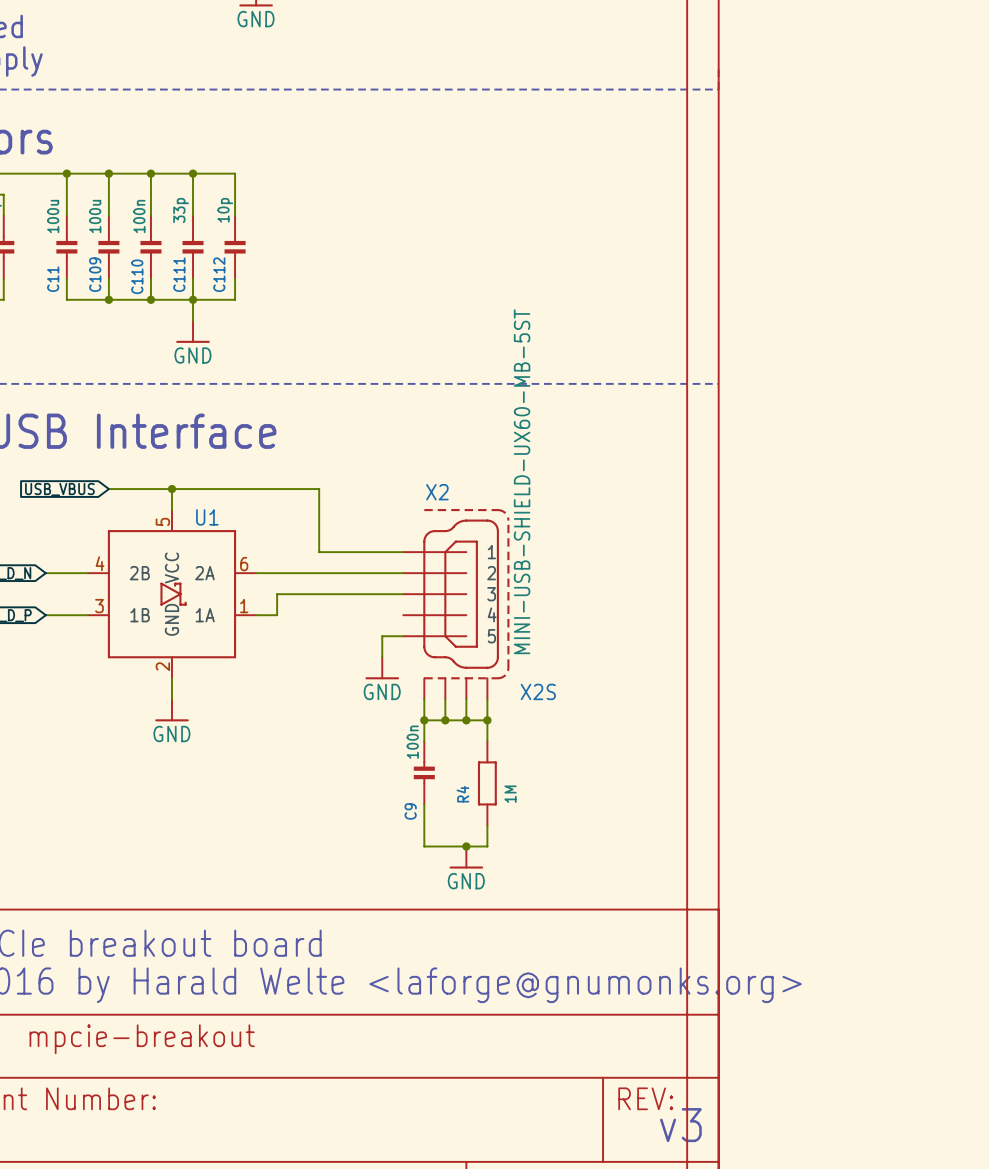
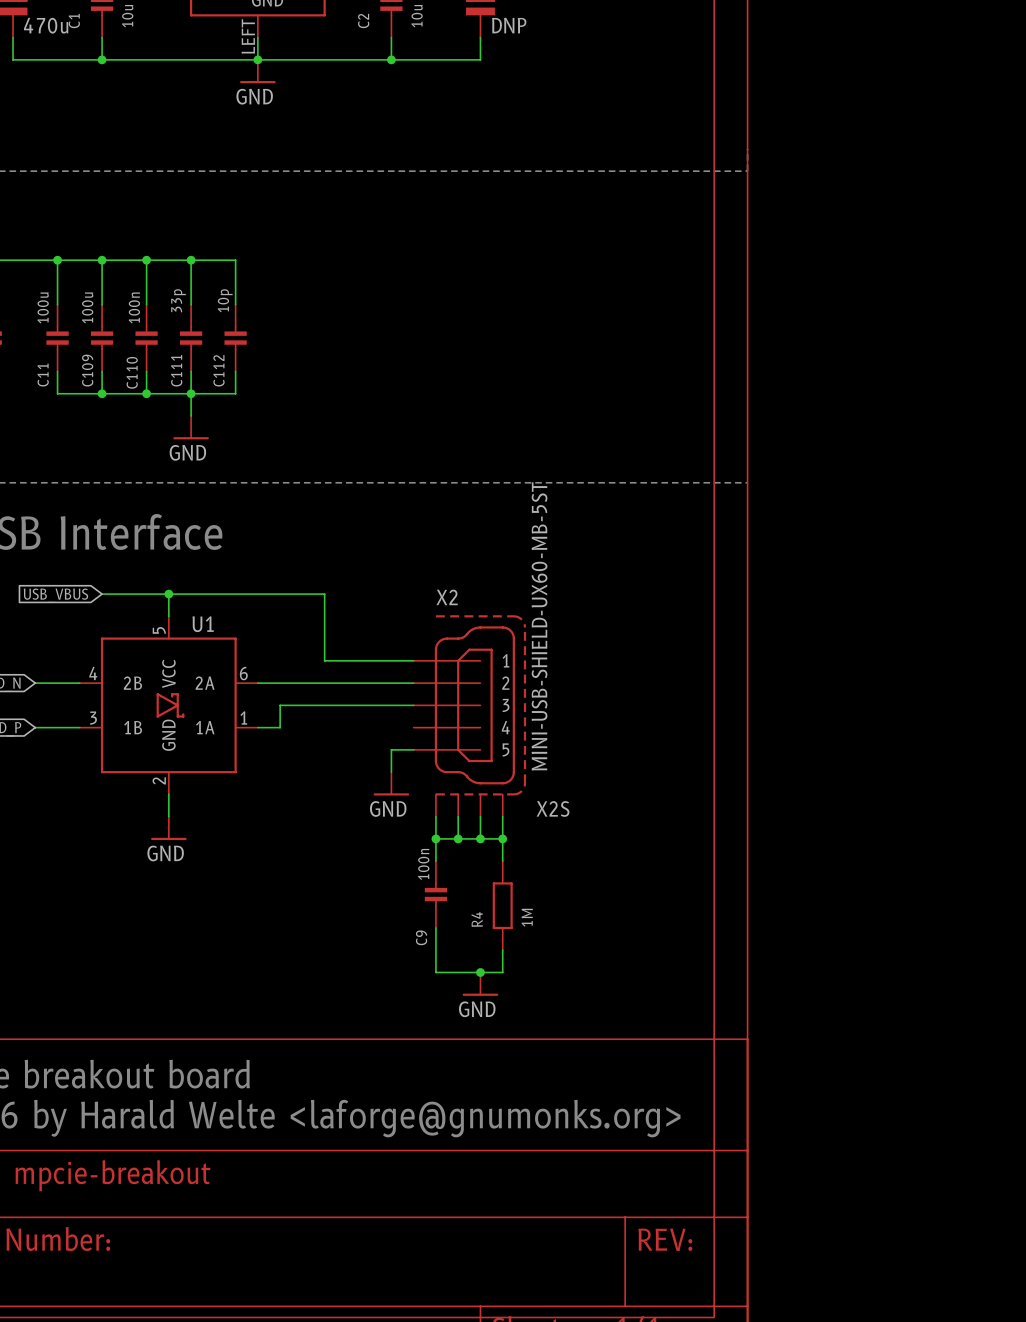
text: v3 (680, 1125) -> none

